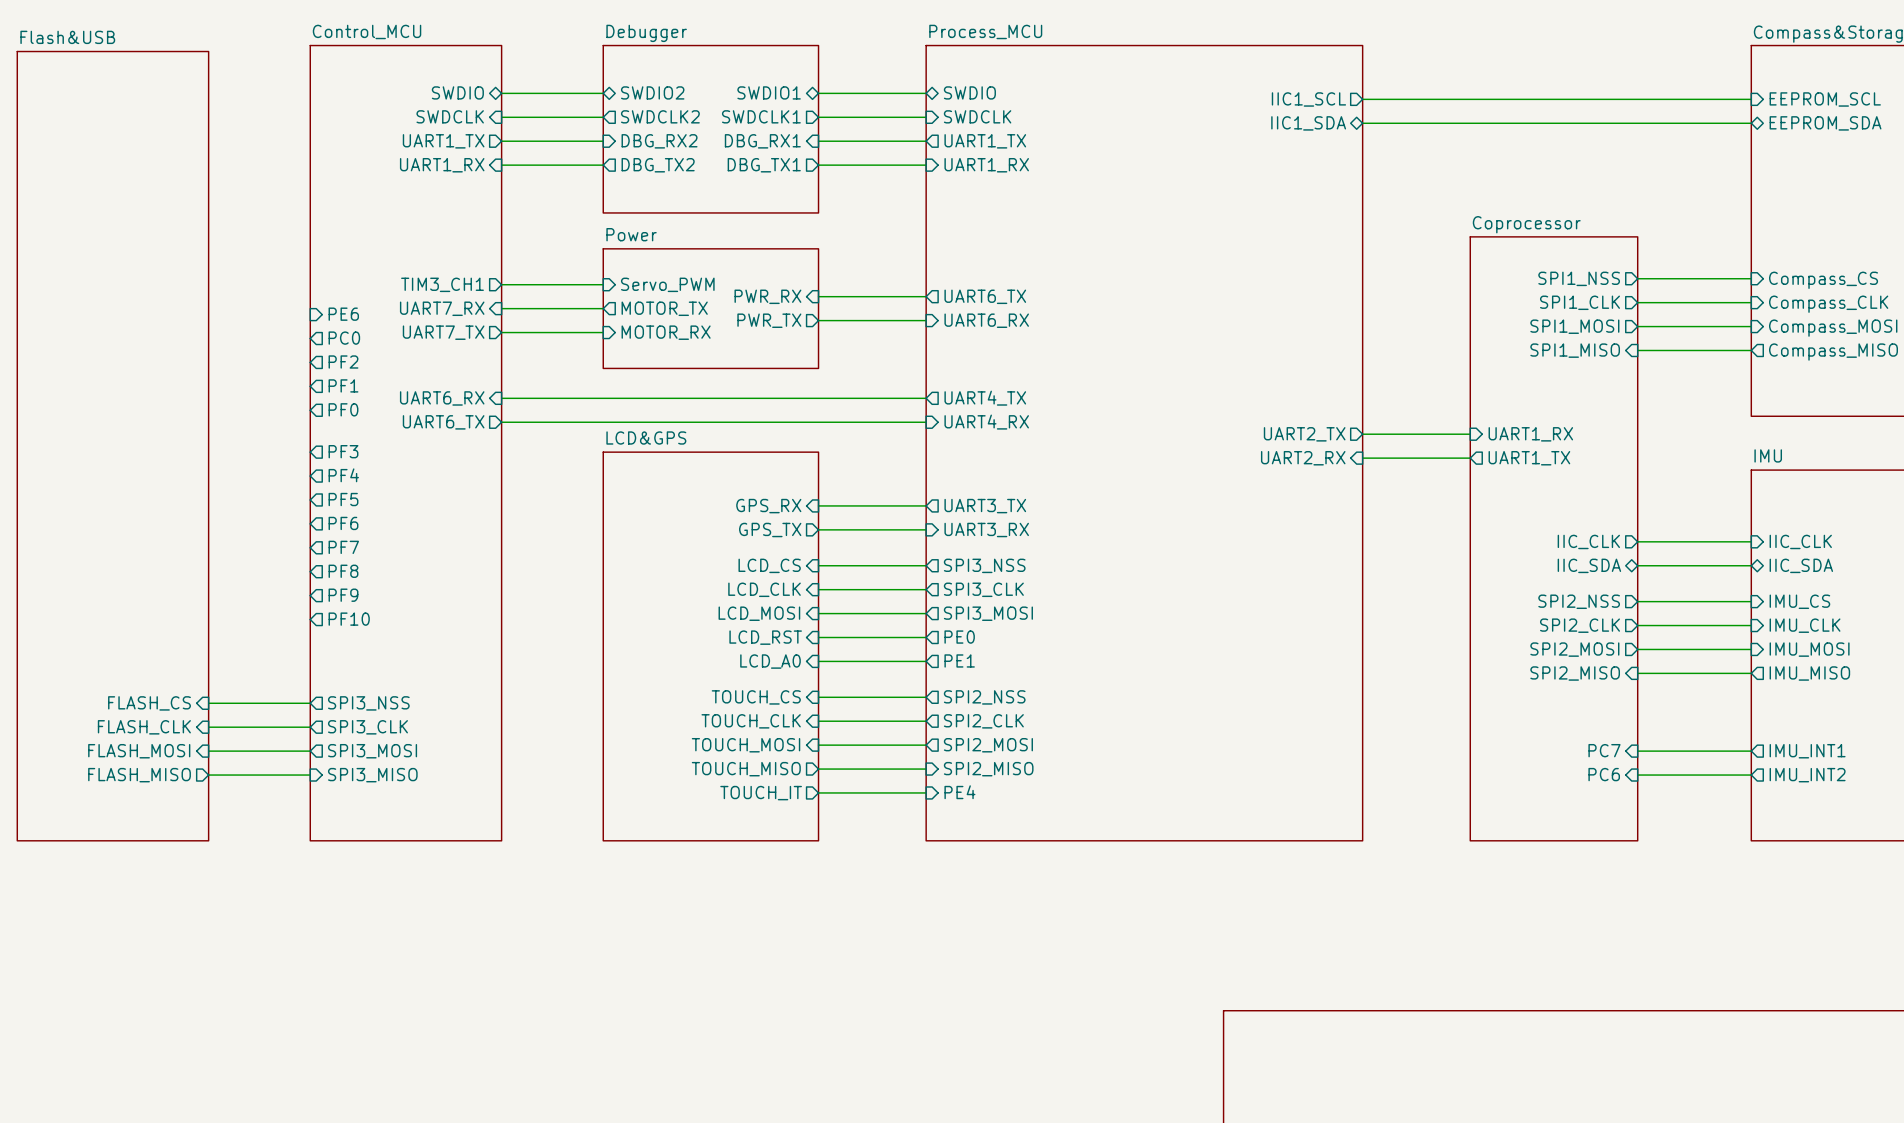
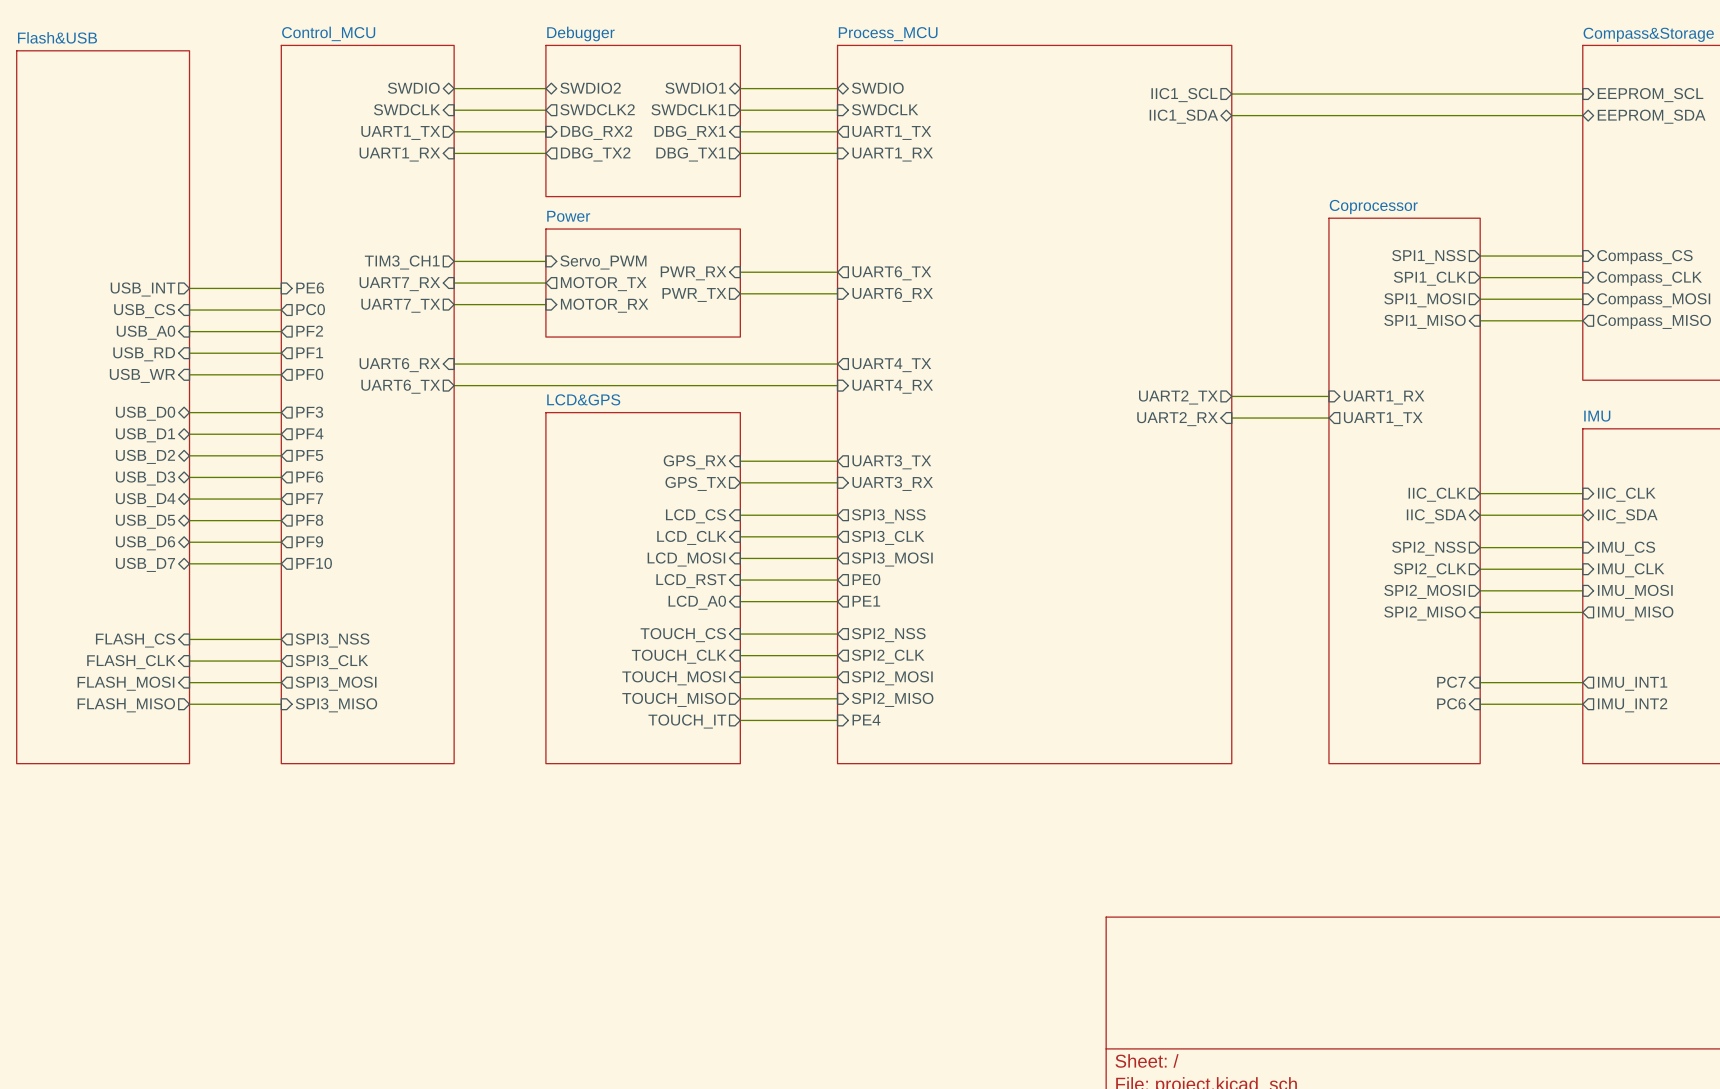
sheet pin: none -> USB_INT (143, 289)
wire: none -> (189, 288) (281, 288)
sheet pin: none -> USB_CS (144, 311)
wire: none -> (189, 310) (281, 310)
sheet pin: none -> USB_A0 (145, 332)
wire: none -> (189, 331) (281, 331)
sheet pin: none -> USB_RD (144, 354)
wire: none -> (189, 353) (281, 353)
sheet pin: none -> USB_WR (142, 375)
wire: none -> (189, 374) (281, 374)
sheet pin: none -> USB_D0 (145, 413)
wire: none -> (189, 412) (281, 412)
sheet pin: none -> USB_D1 (145, 435)
wire: none -> (189, 434) (281, 434)
wire: none -> (189, 455) (281, 455)
sheet pin: none -> USB_D2 (145, 456)
wire: none -> (189, 477) (281, 477)
sheet pin: none -> USB_D3 (145, 478)
sheet pin: none -> USB_D4 (145, 500)
wire: none -> (189, 499) (281, 499)
sheet pin: none -> USB_D5 (145, 521)
wire: none -> (189, 520) (281, 520)
sheet pin: none -> USB_D6 (145, 543)
wire: none -> (189, 542) (281, 542)
sheet pin: none -> USB_D7 (145, 564)
wire: none -> (189, 563) (281, 563)

